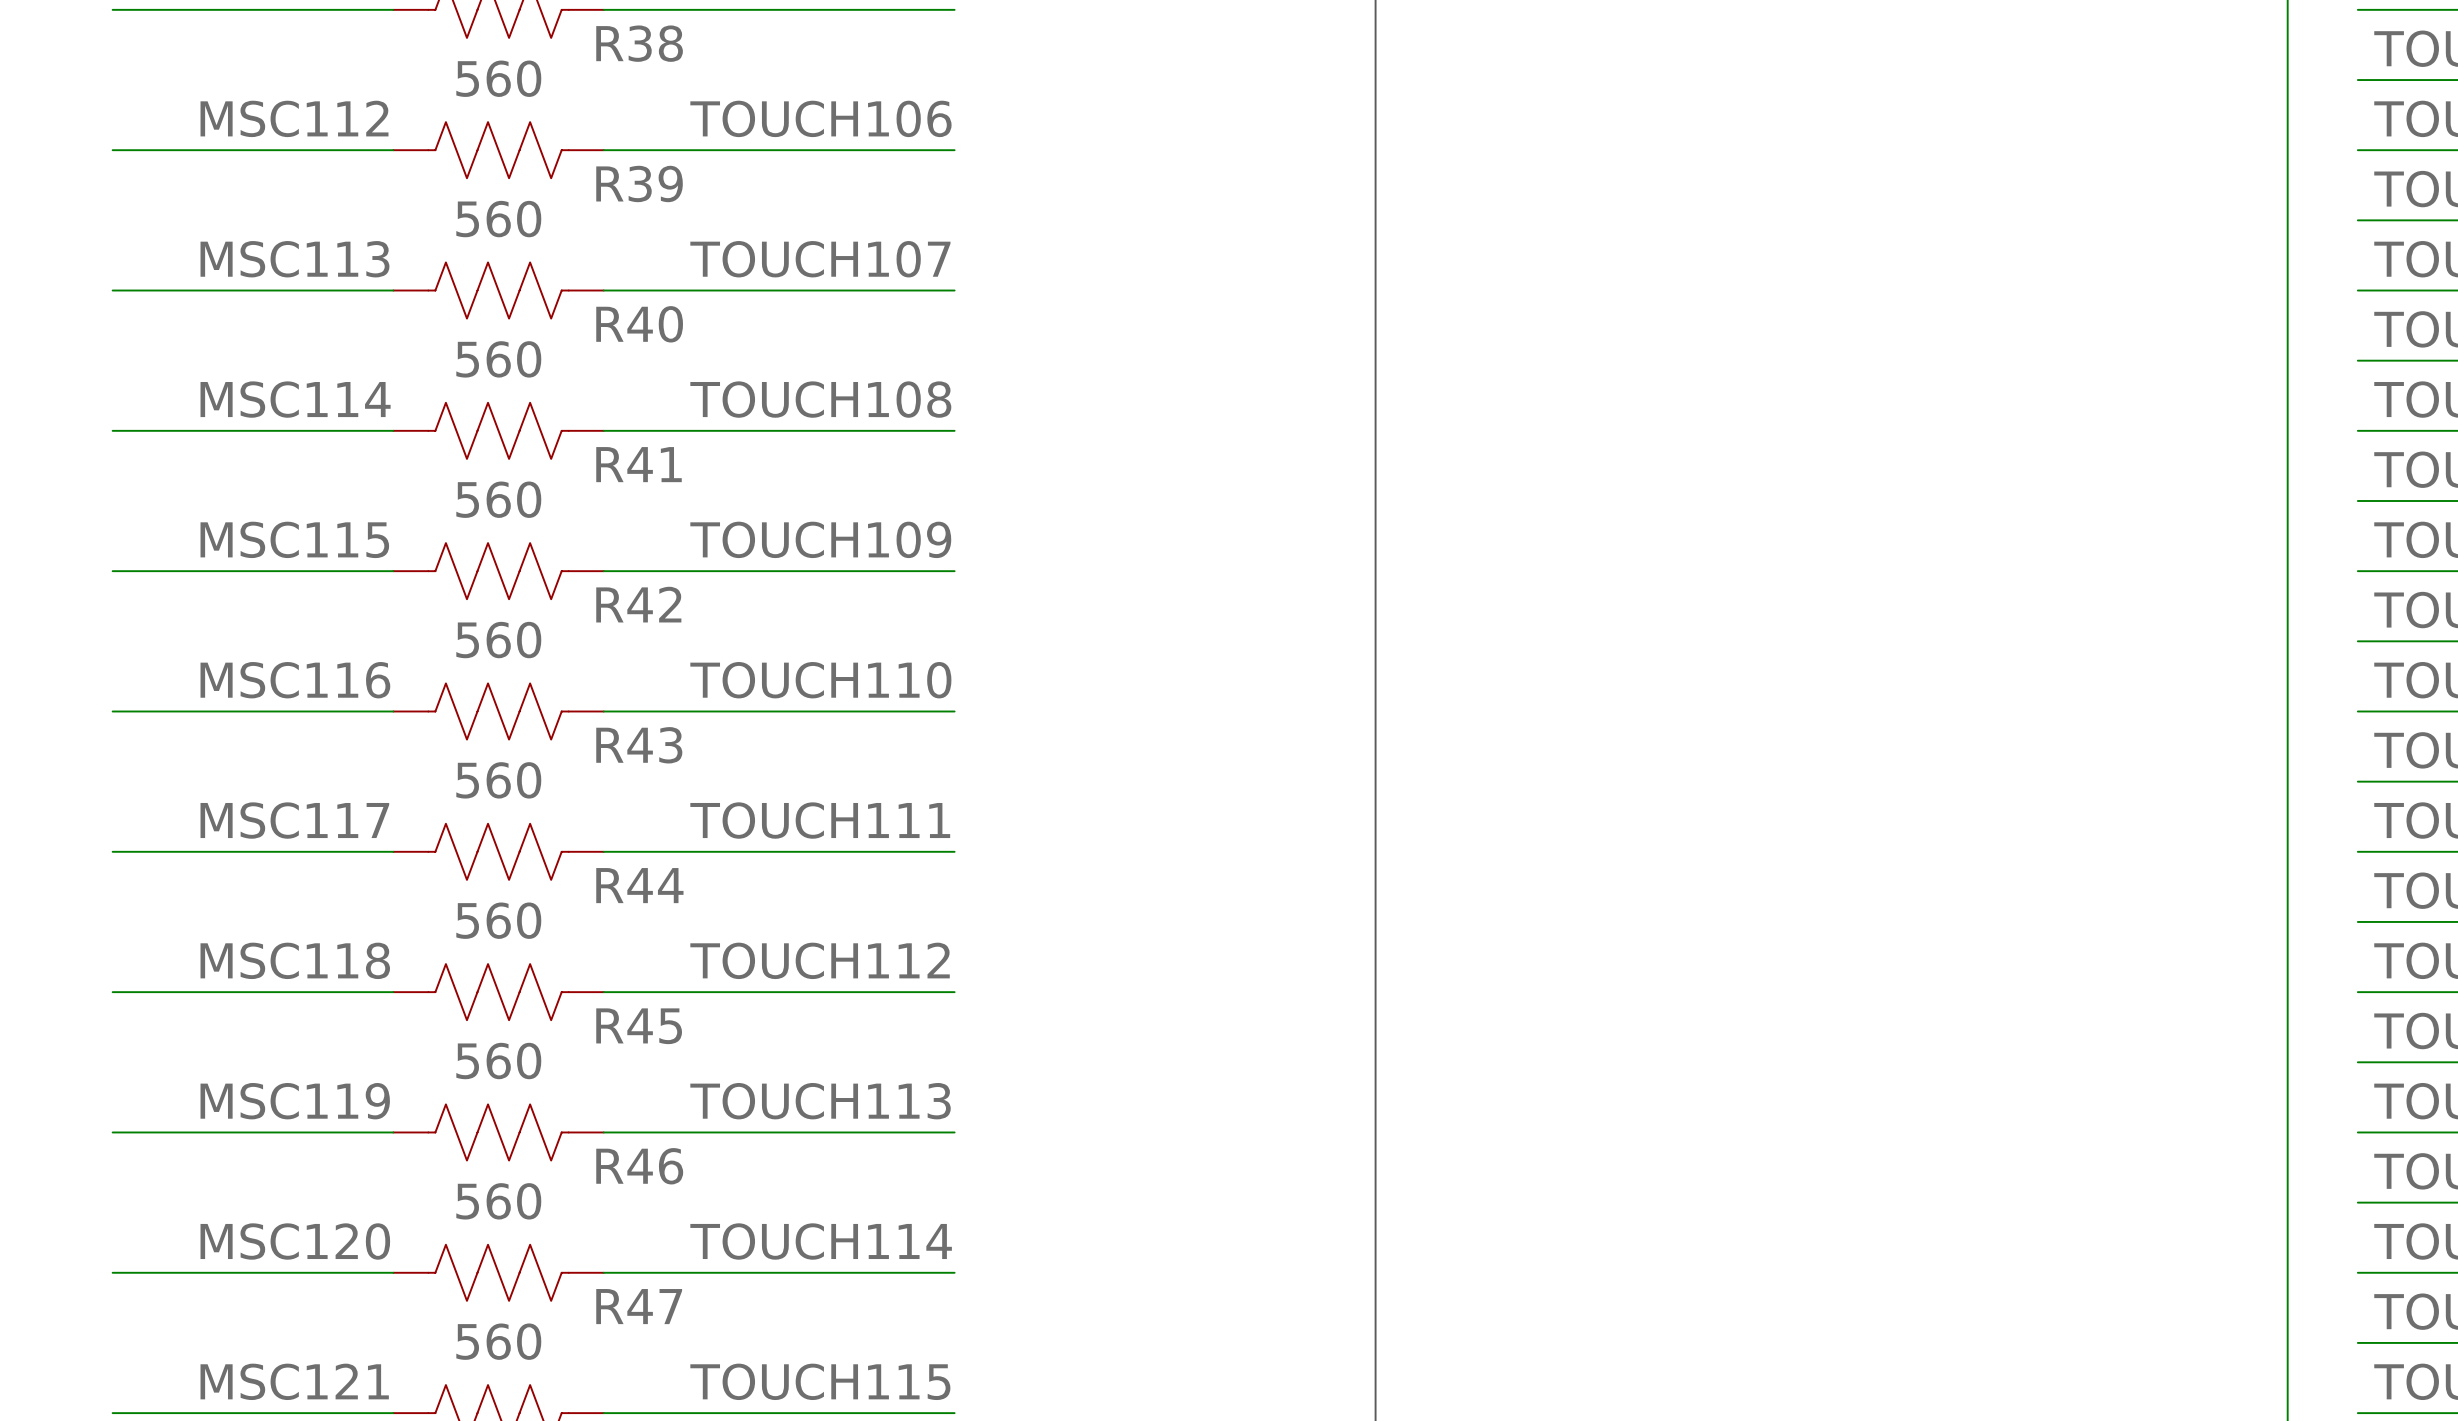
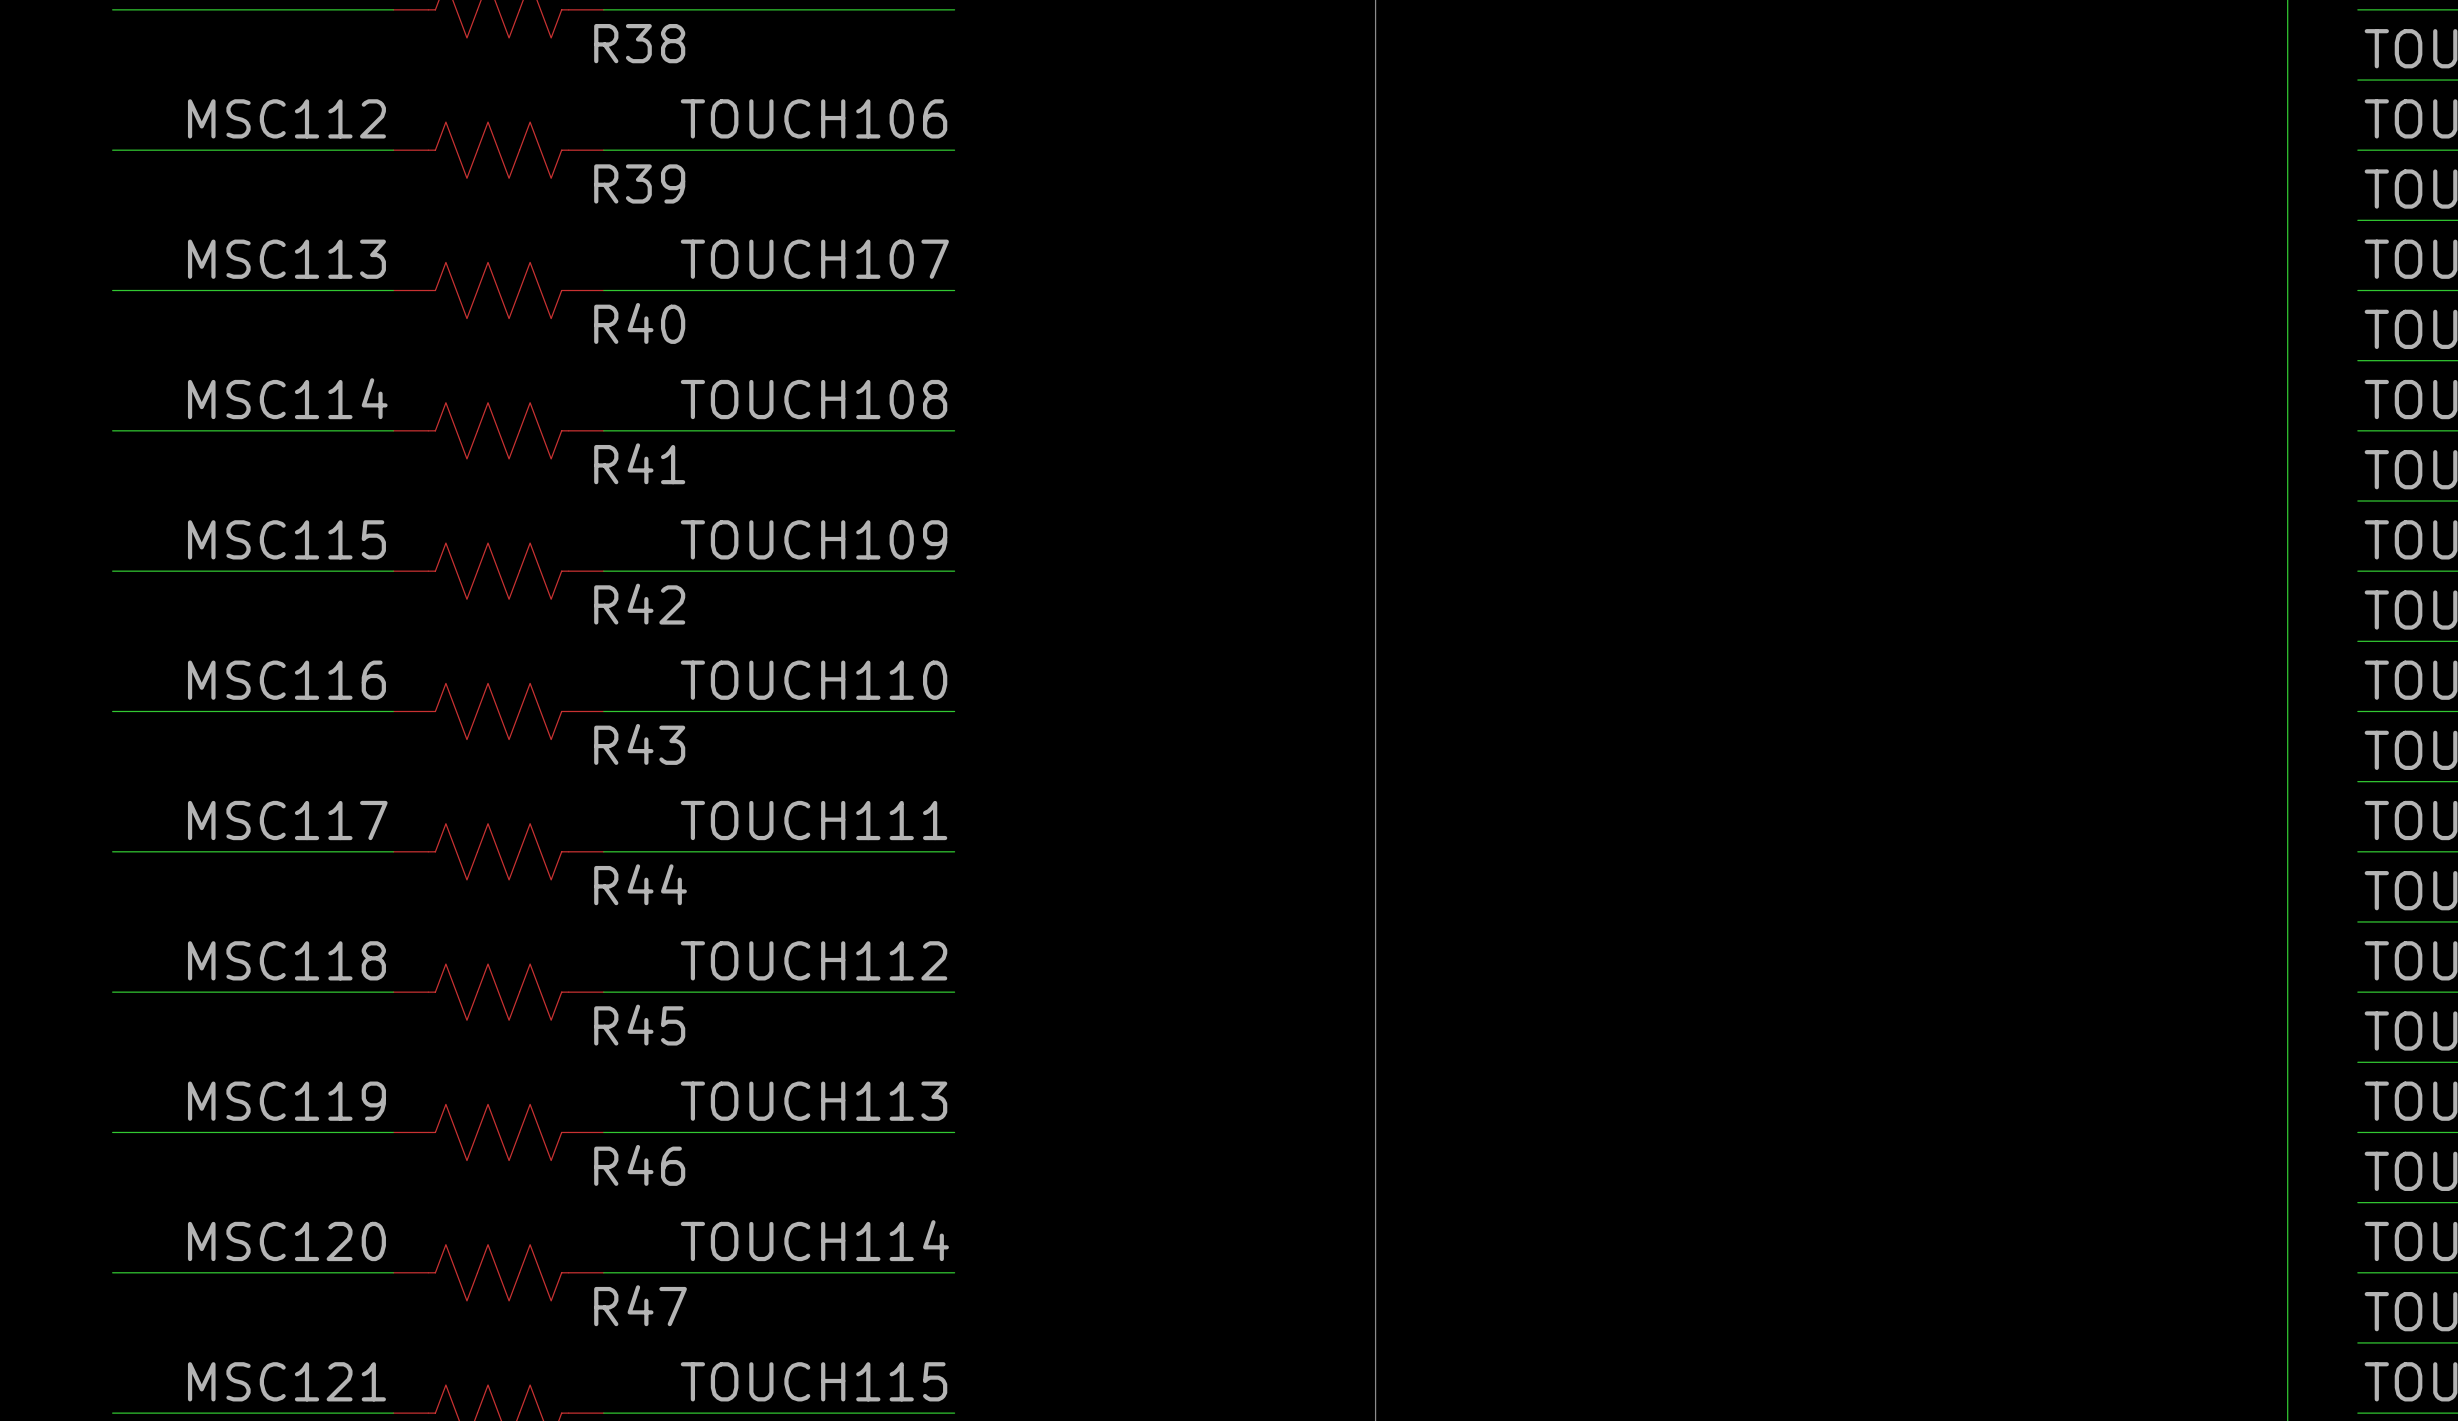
R39 value: 560 (498, 78) -> none
R40 value: 560 (498, 219) -> none
R41 value: 560 (498, 359) -> none
R42 value: 560 (498, 499) -> none
R43 value: 560 (498, 640) -> none
R44 value: 560 (498, 780) -> none
R45 value: 560 (498, 920) -> none
R46 value: 560 (498, 1061) -> none
R47 value: 560 (498, 1201) -> none
part value: 560 (498, 1341) -> none

